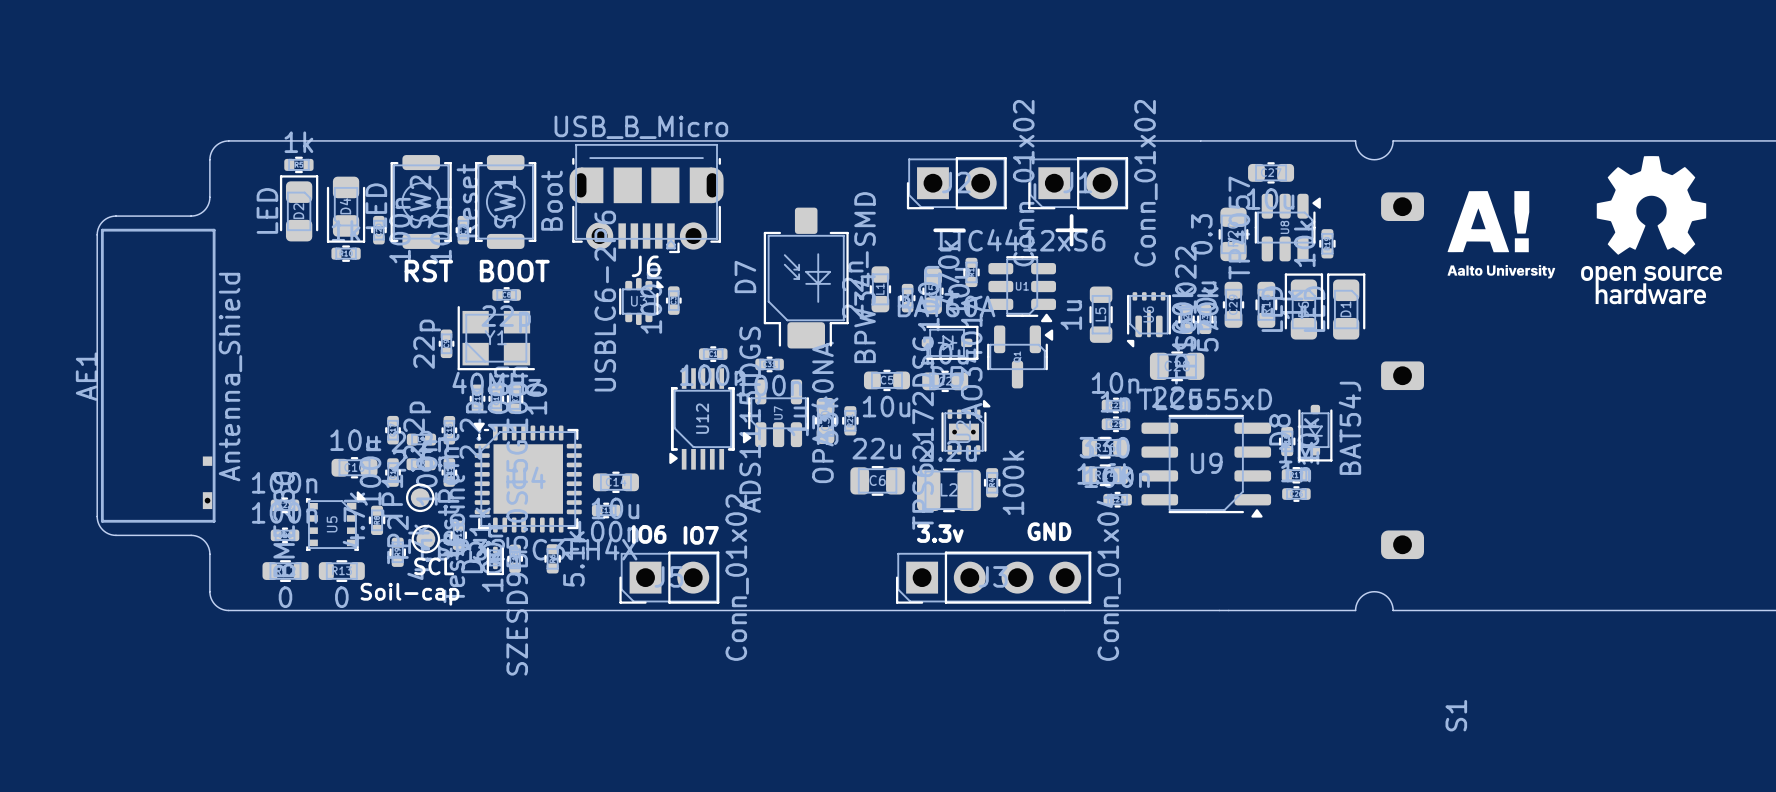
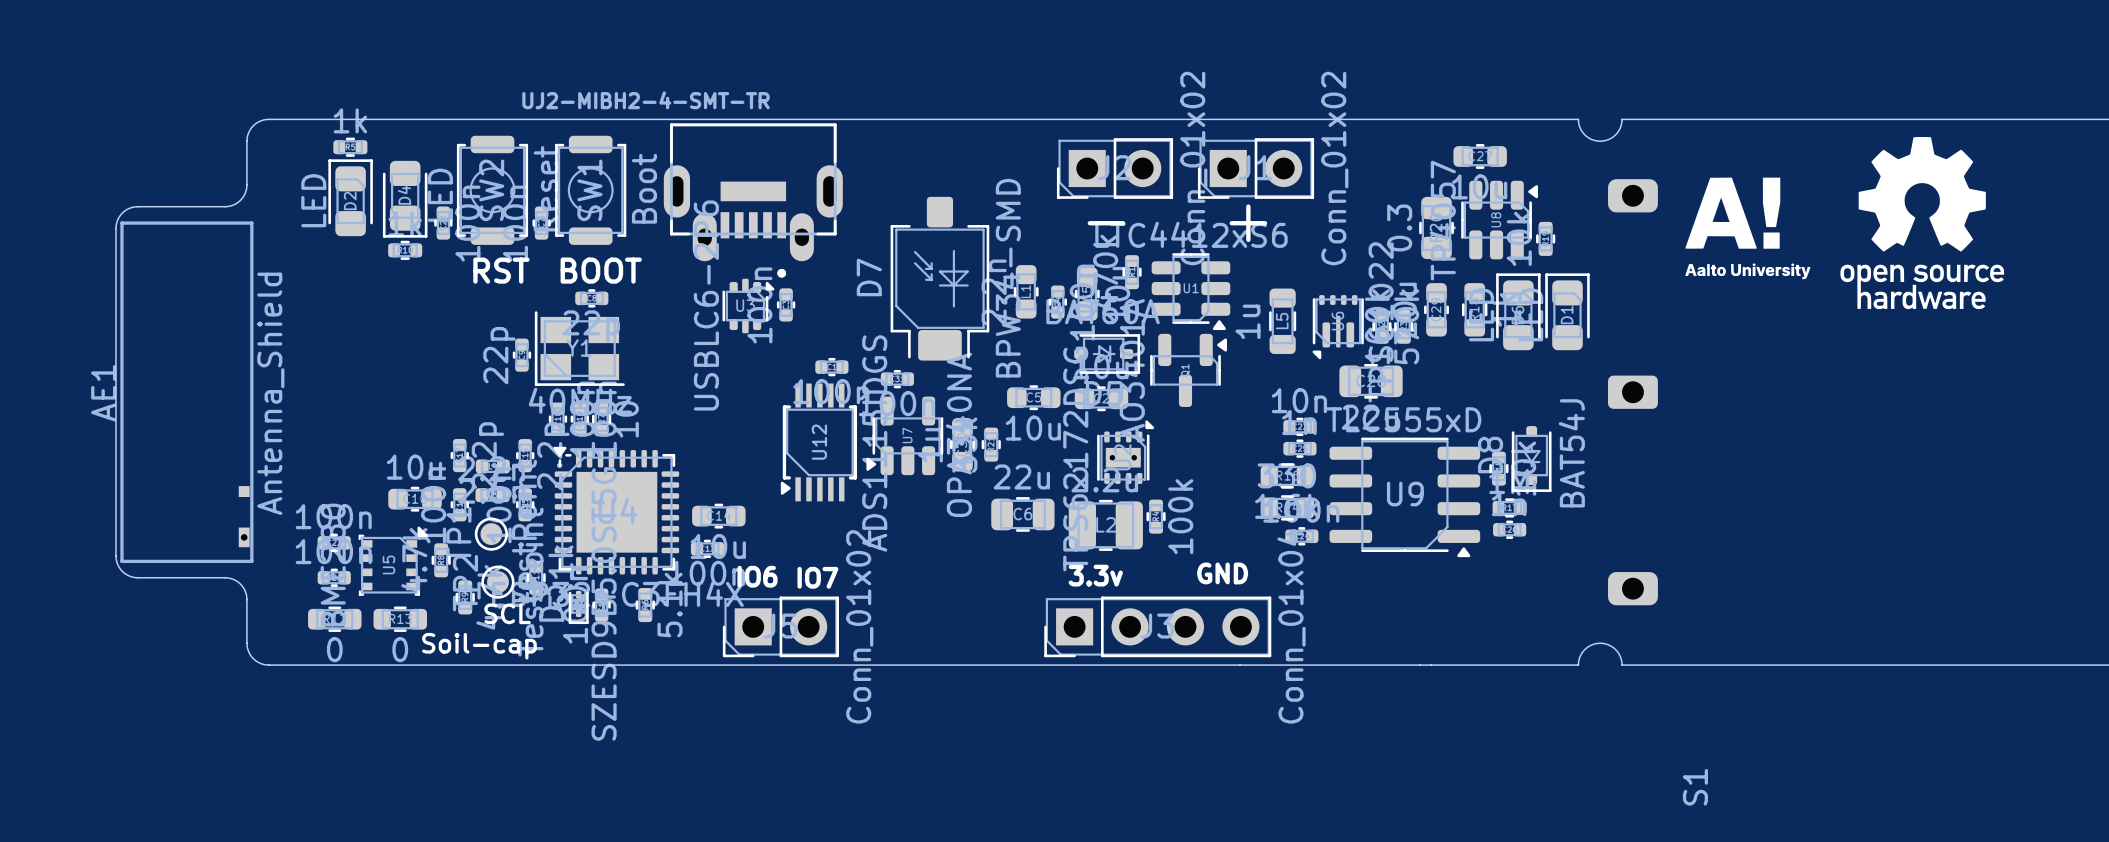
J6: USB_B_Micro (646, 198) -> none
part: none -> UJ2-MIBH2-4-SMT-TR (753, 200)

